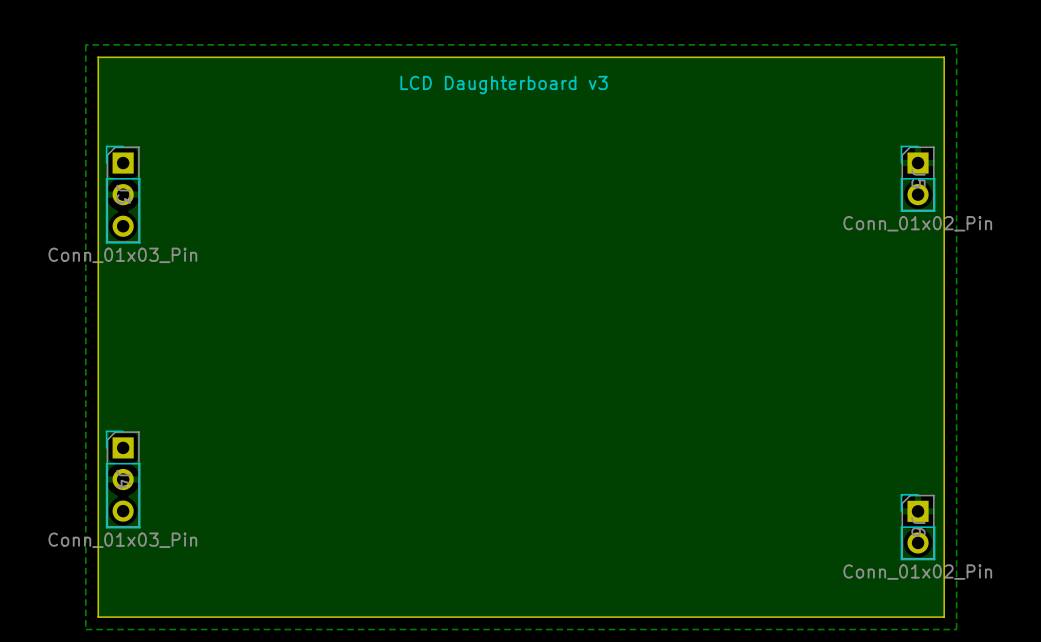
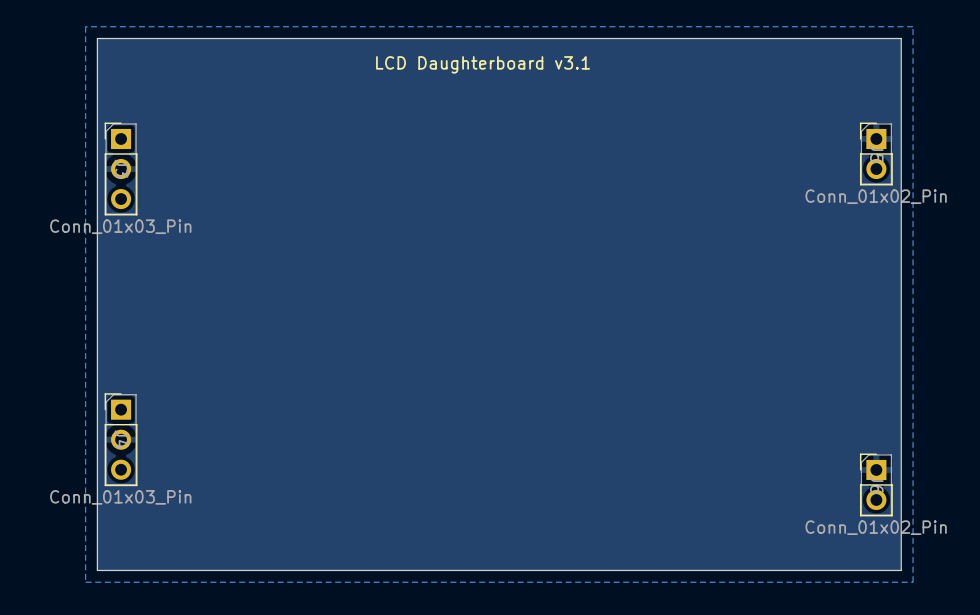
text: LCD Daughterboard v3 (504, 85) -> LCD Daughterboard v3.1 (483, 64)

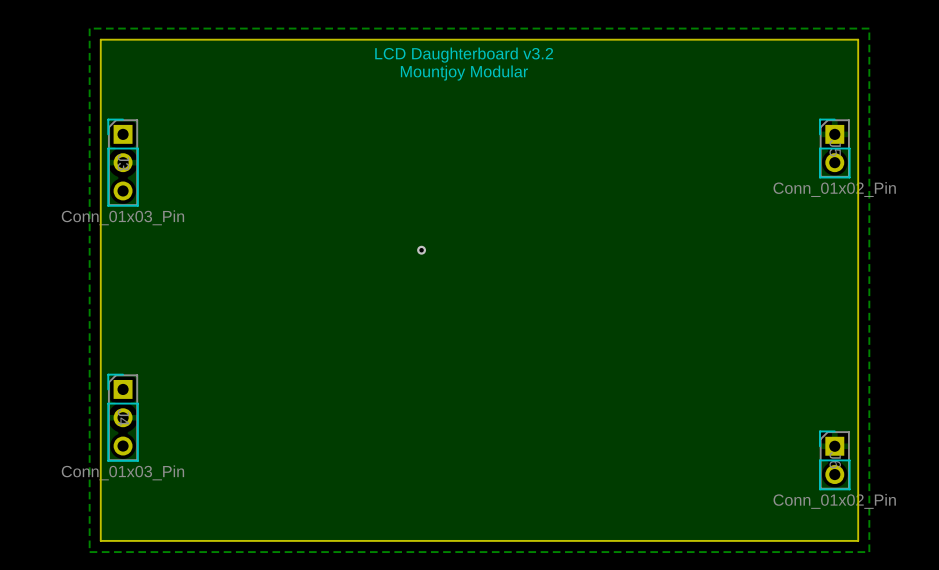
text: LCD Daughterboard v3.1 (483, 64) -> LCD Daughterboard v3.2 (464, 55)
text: none -> Mountjoy Modular (464, 73)
via: none -> (421, 250)

